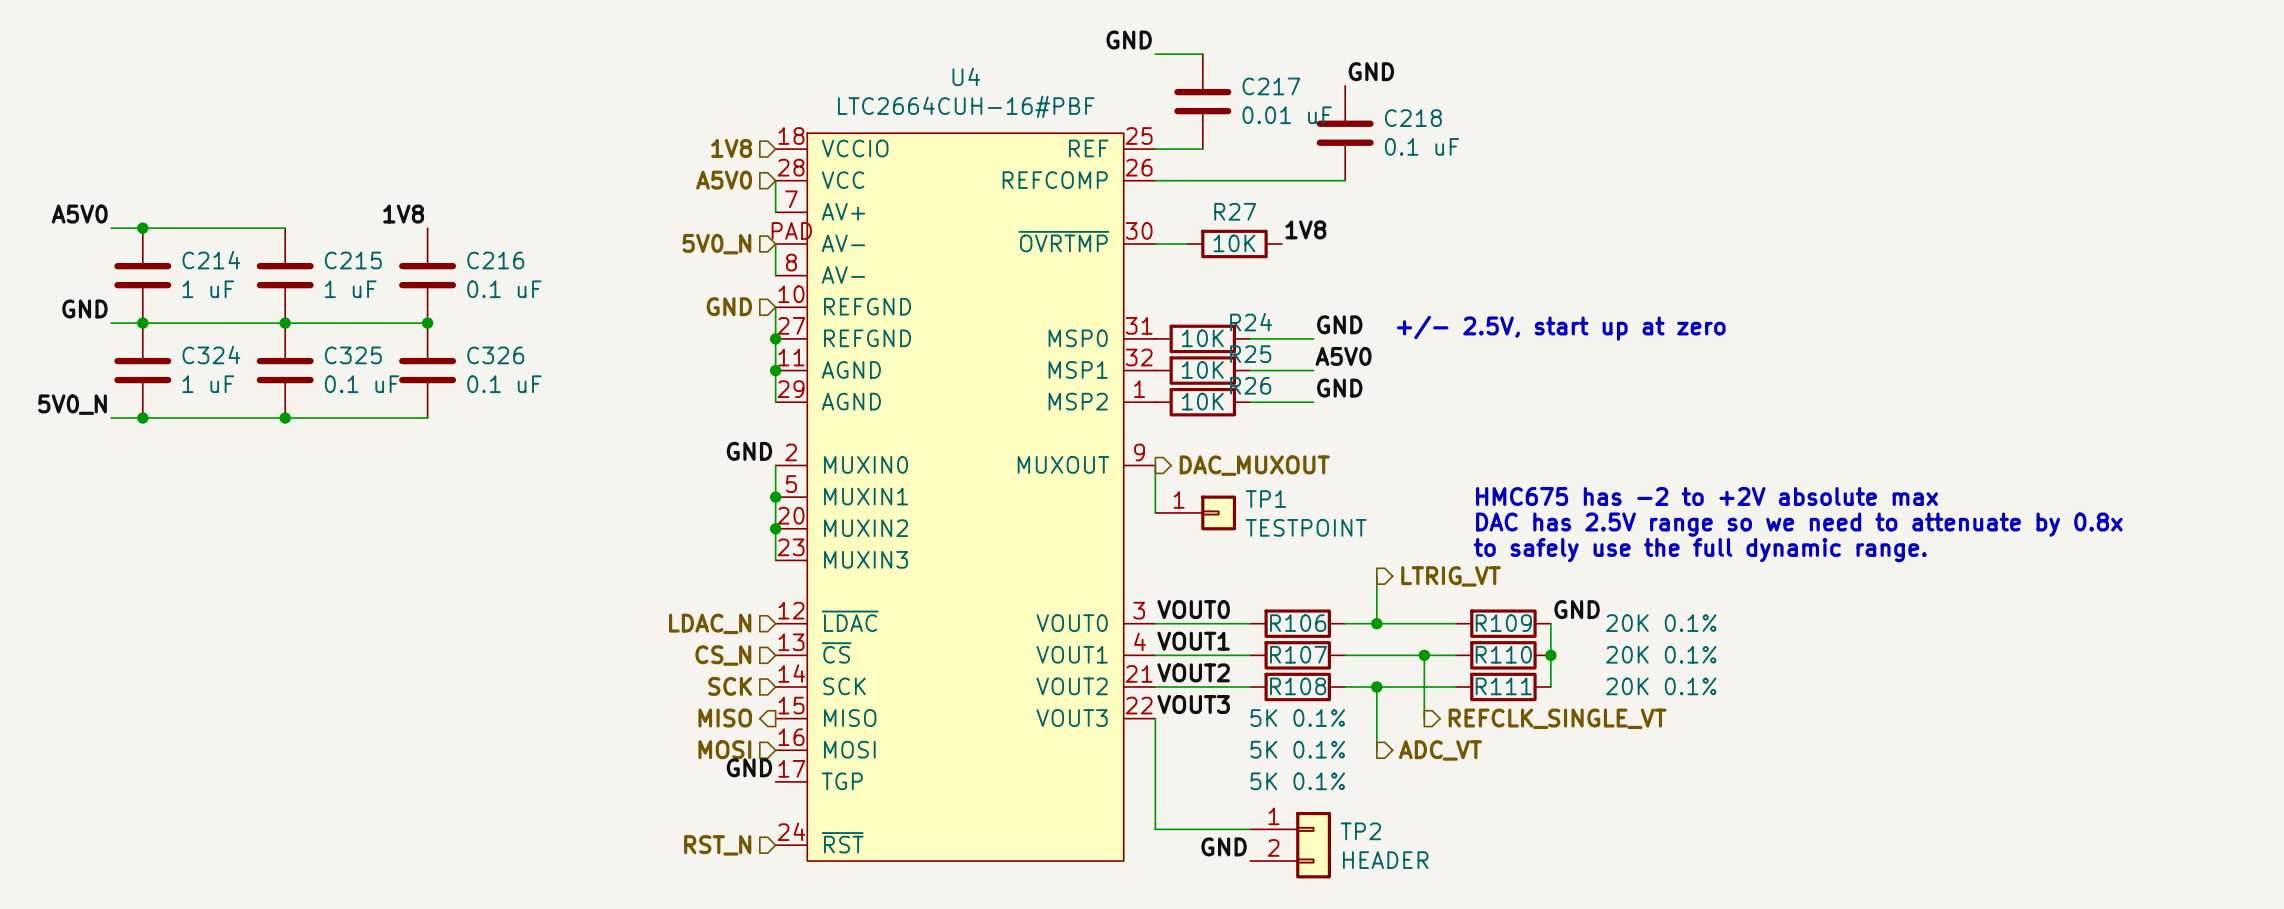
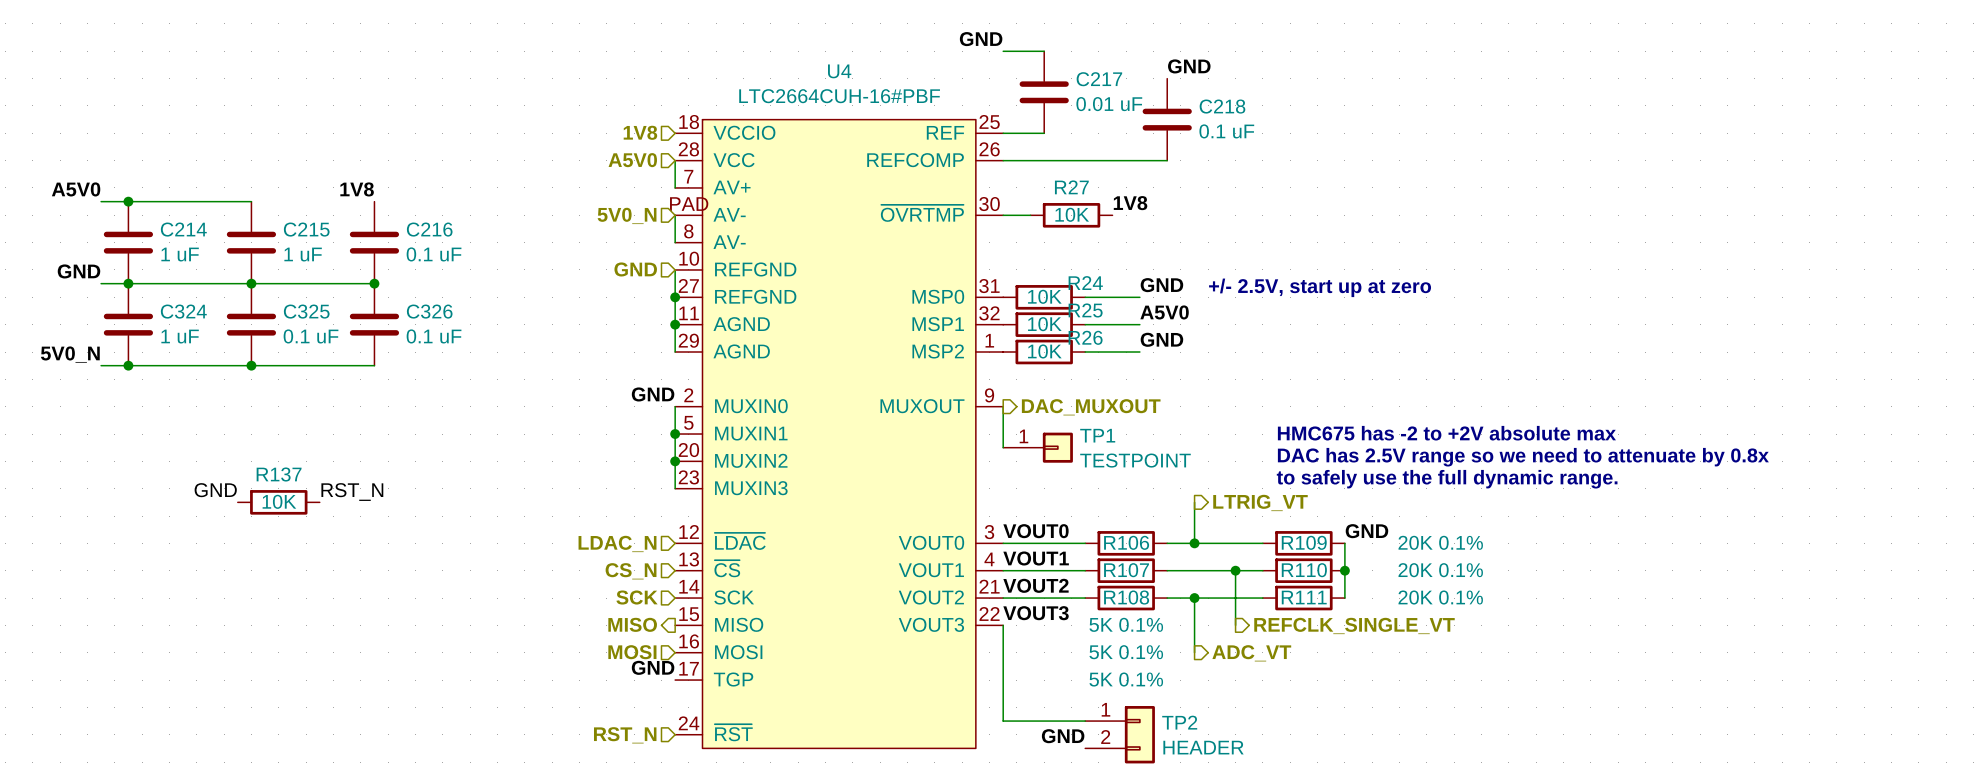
label: none -> GND (215, 490)
label: none -> RST_N (352, 492)
R137: none -> 10K (278, 502)

